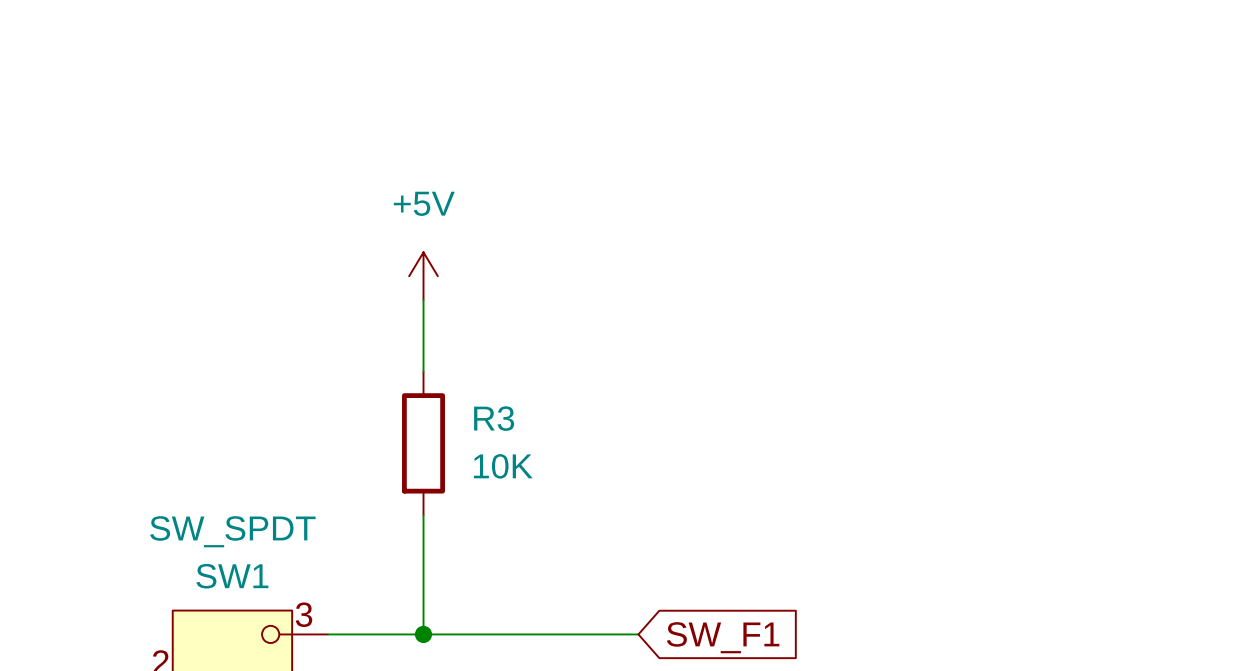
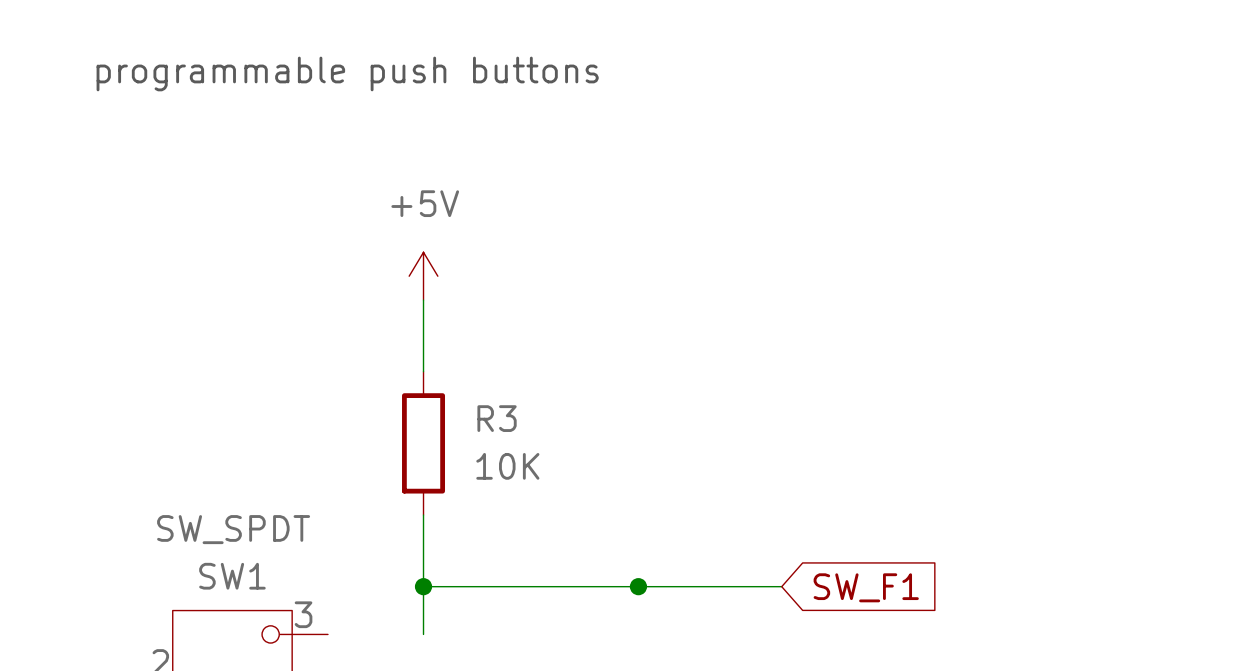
text: none -> programmable push buttons (347, 73)
wire: none -> (423, 586) (781, 586)
junction: none -> (638, 586)
wire: (327, 634) (638, 634) -> none
junction position: (423, 634) -> (423, 586)
global label position: SW_F1 (723, 637) -> SW_F1 (866, 587)

